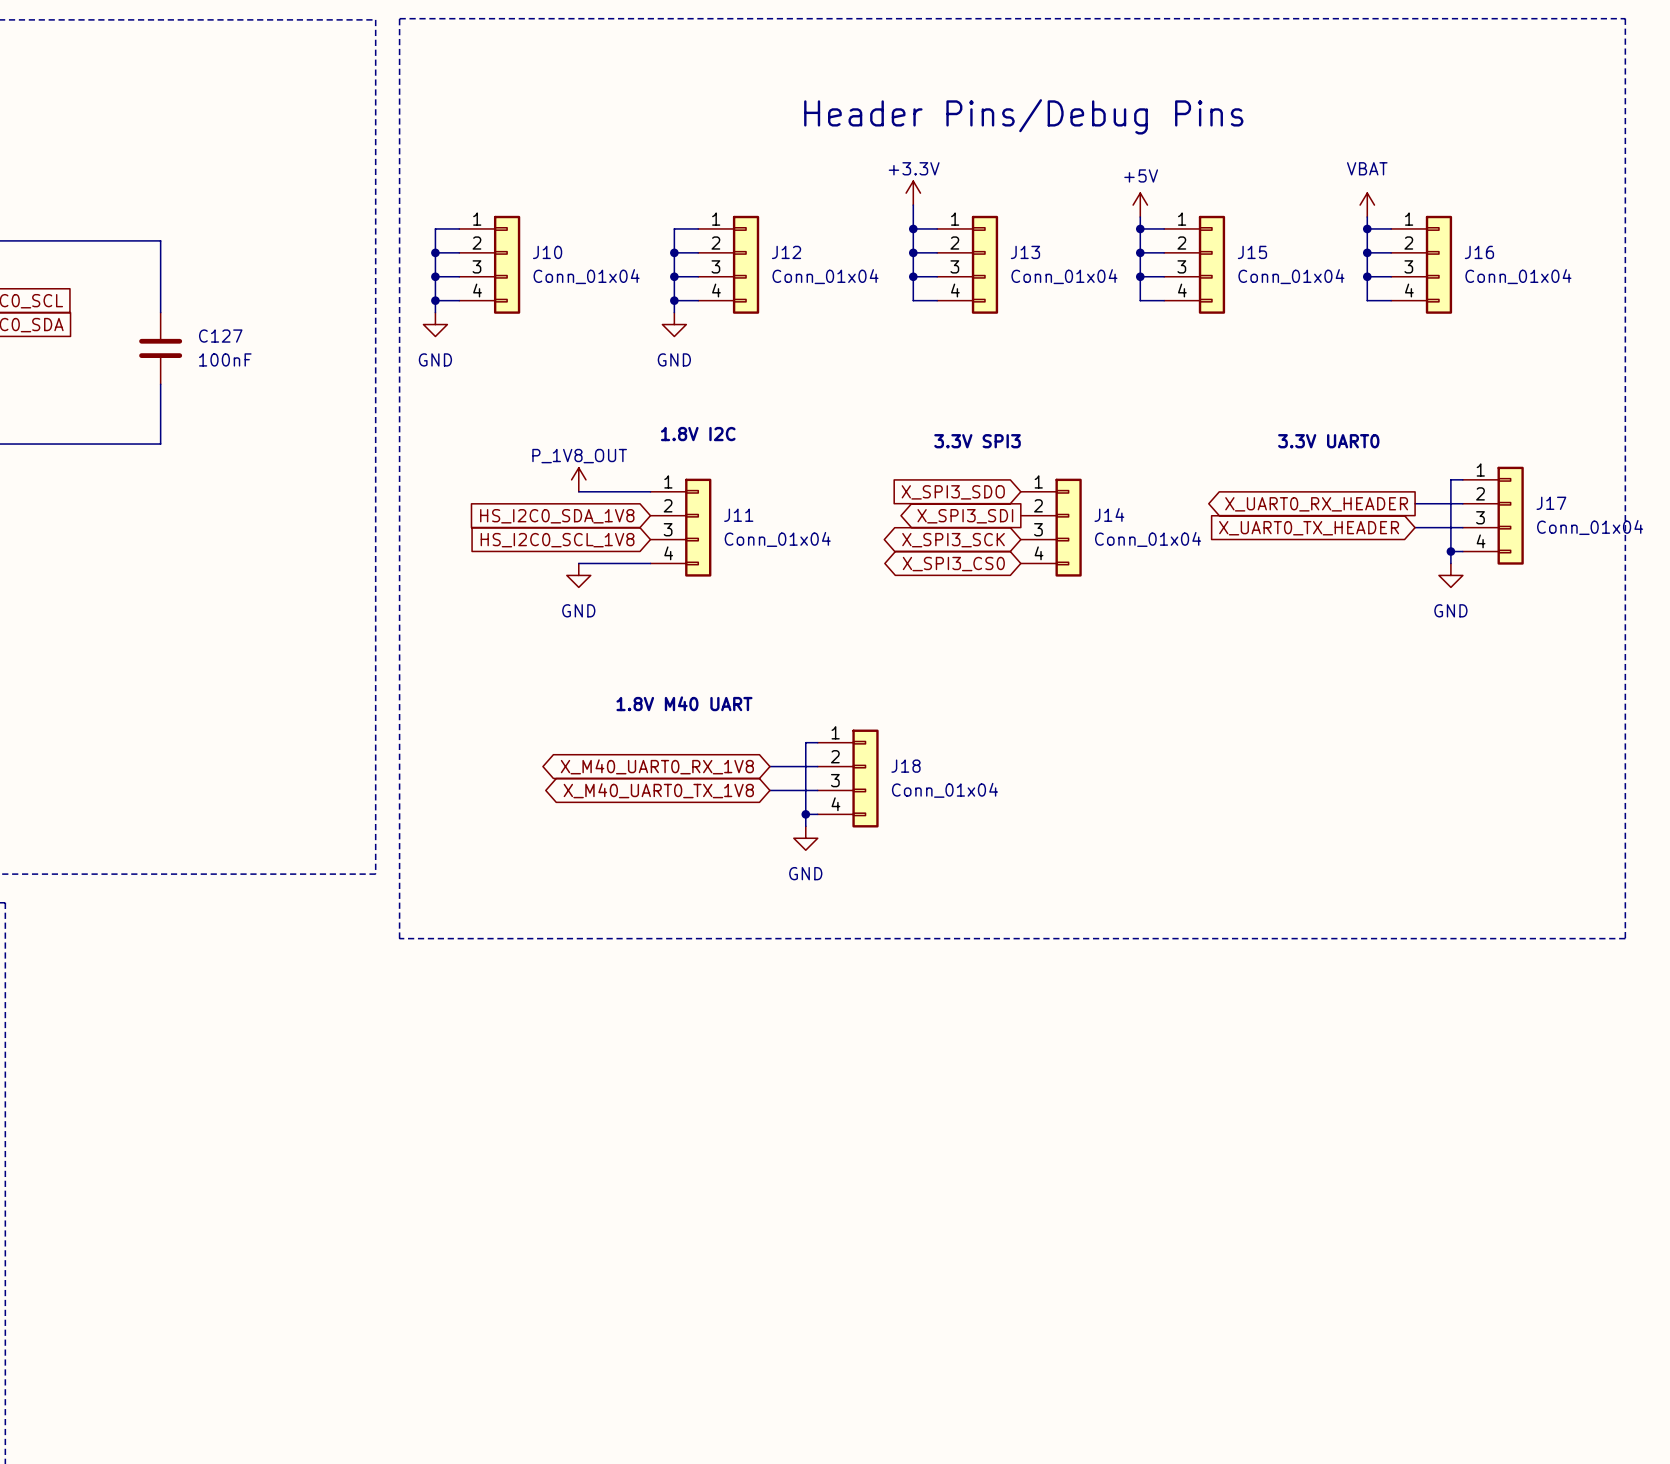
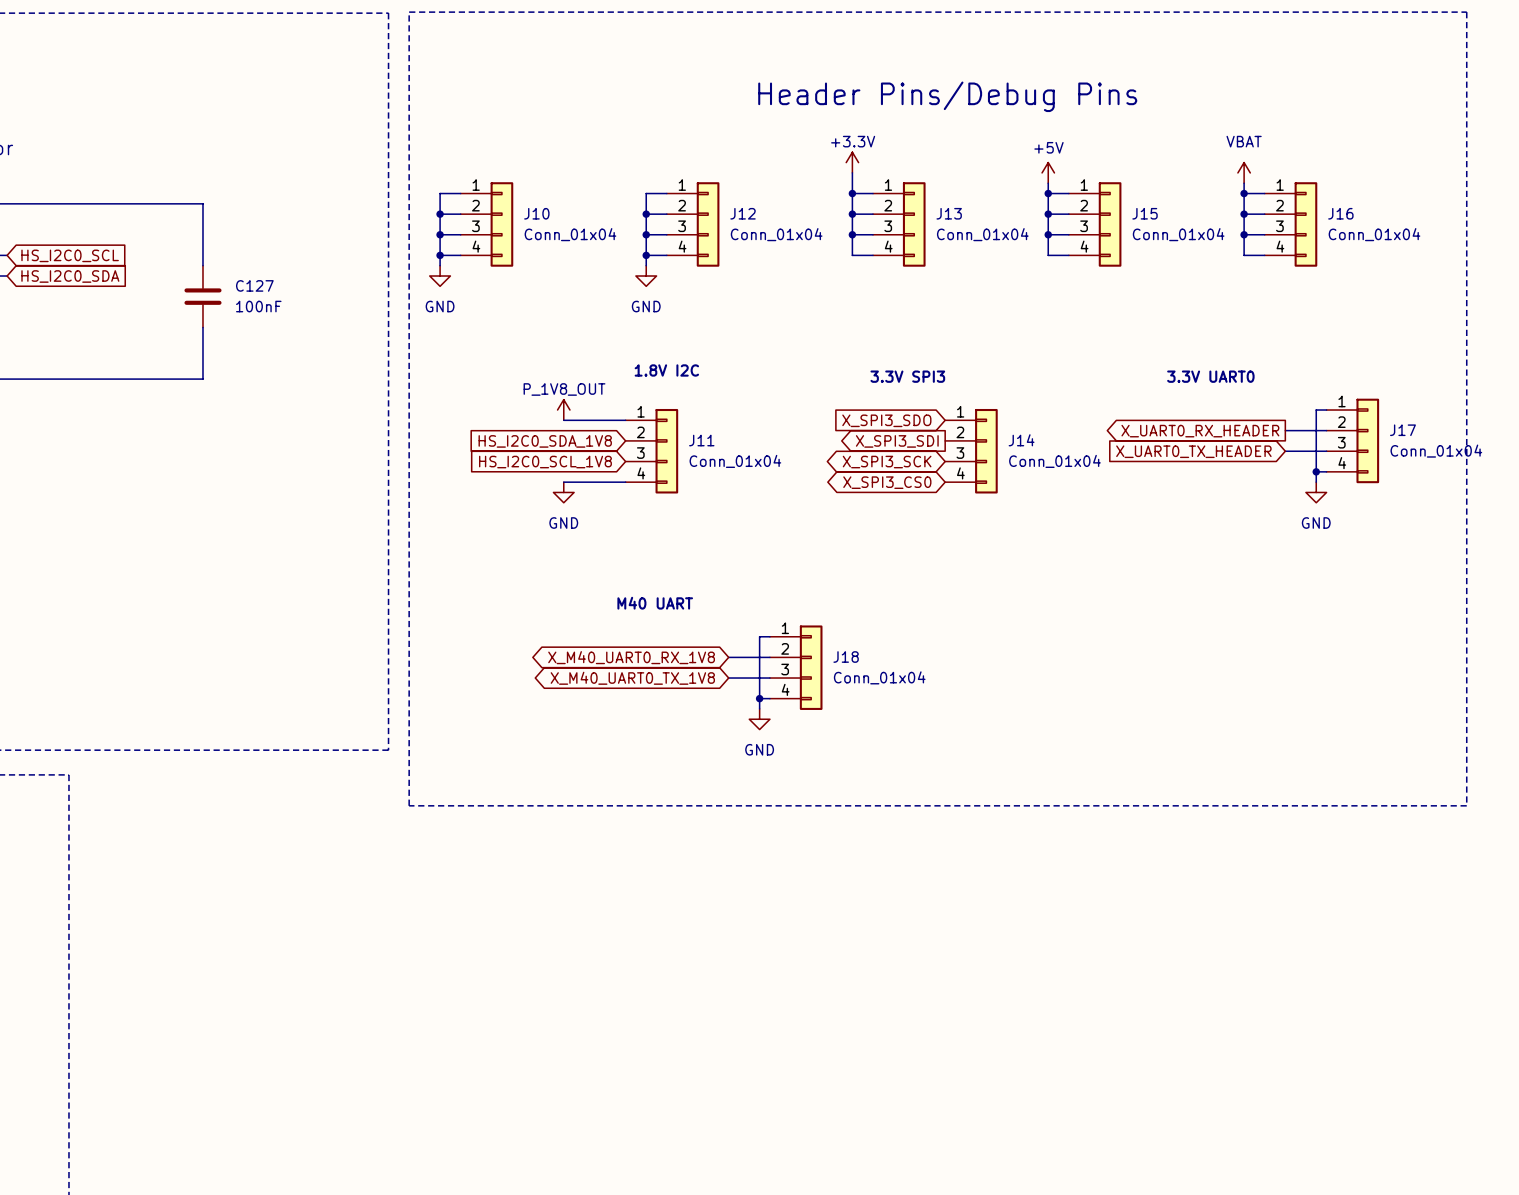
text: 1.8V M40 UART (684, 703) -> M40 UART (655, 603)

